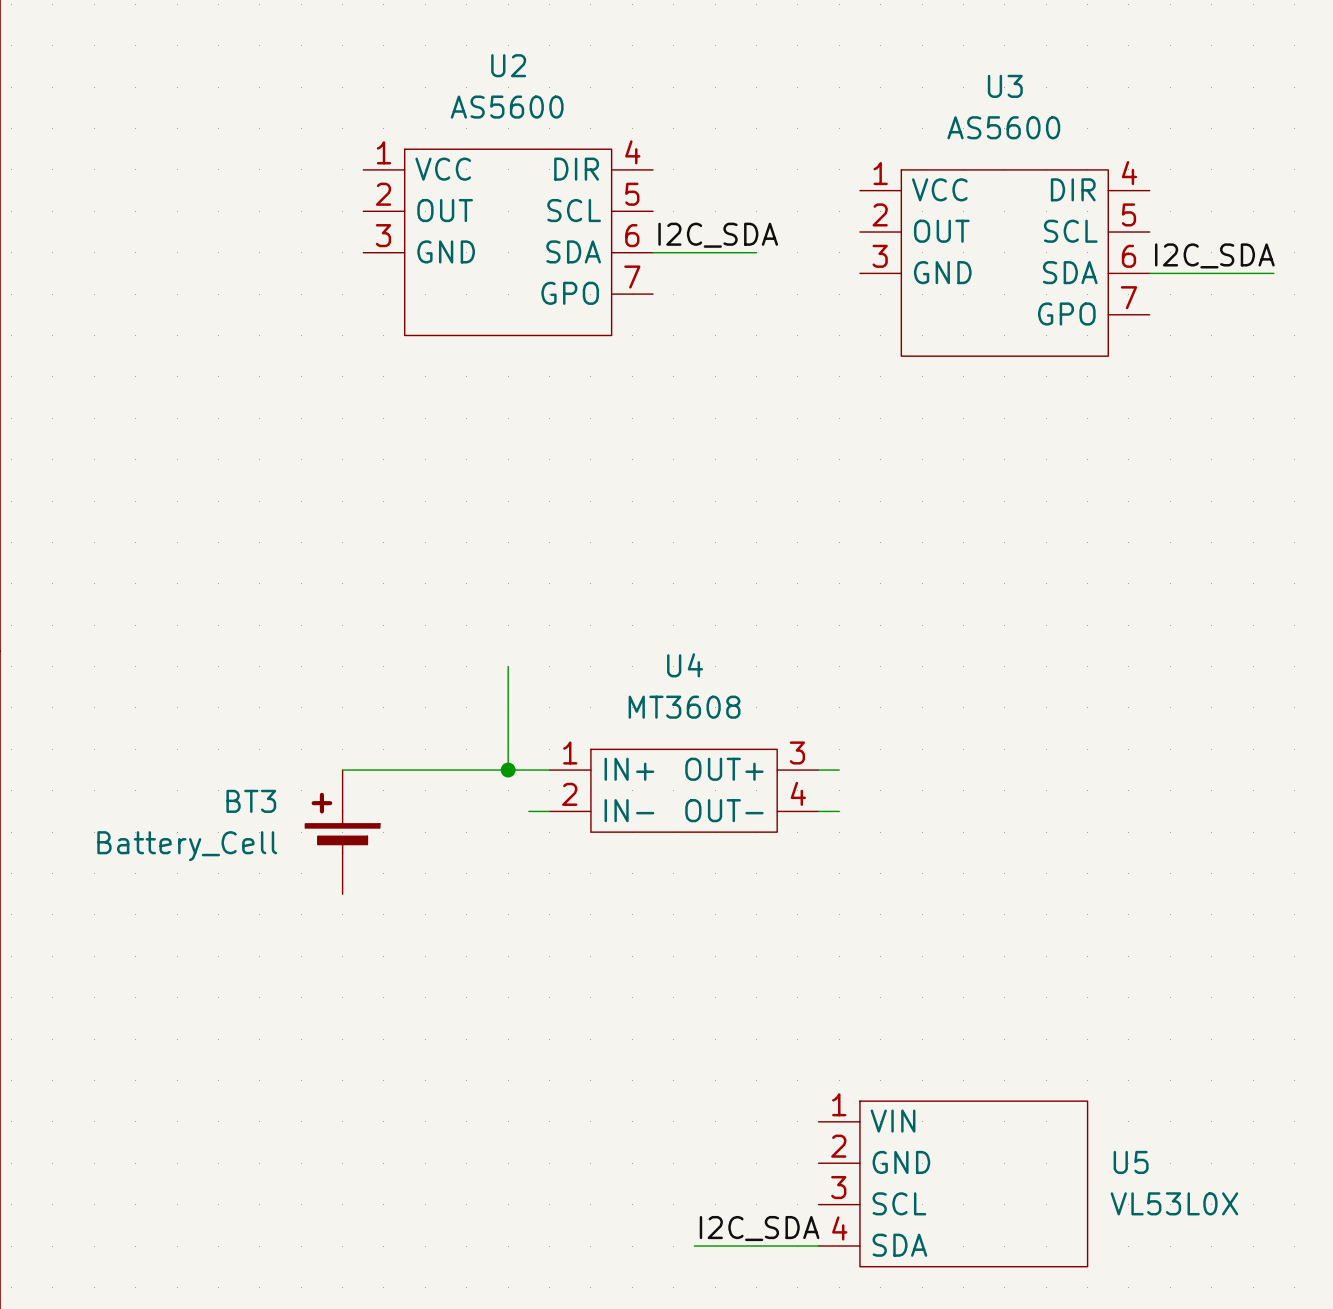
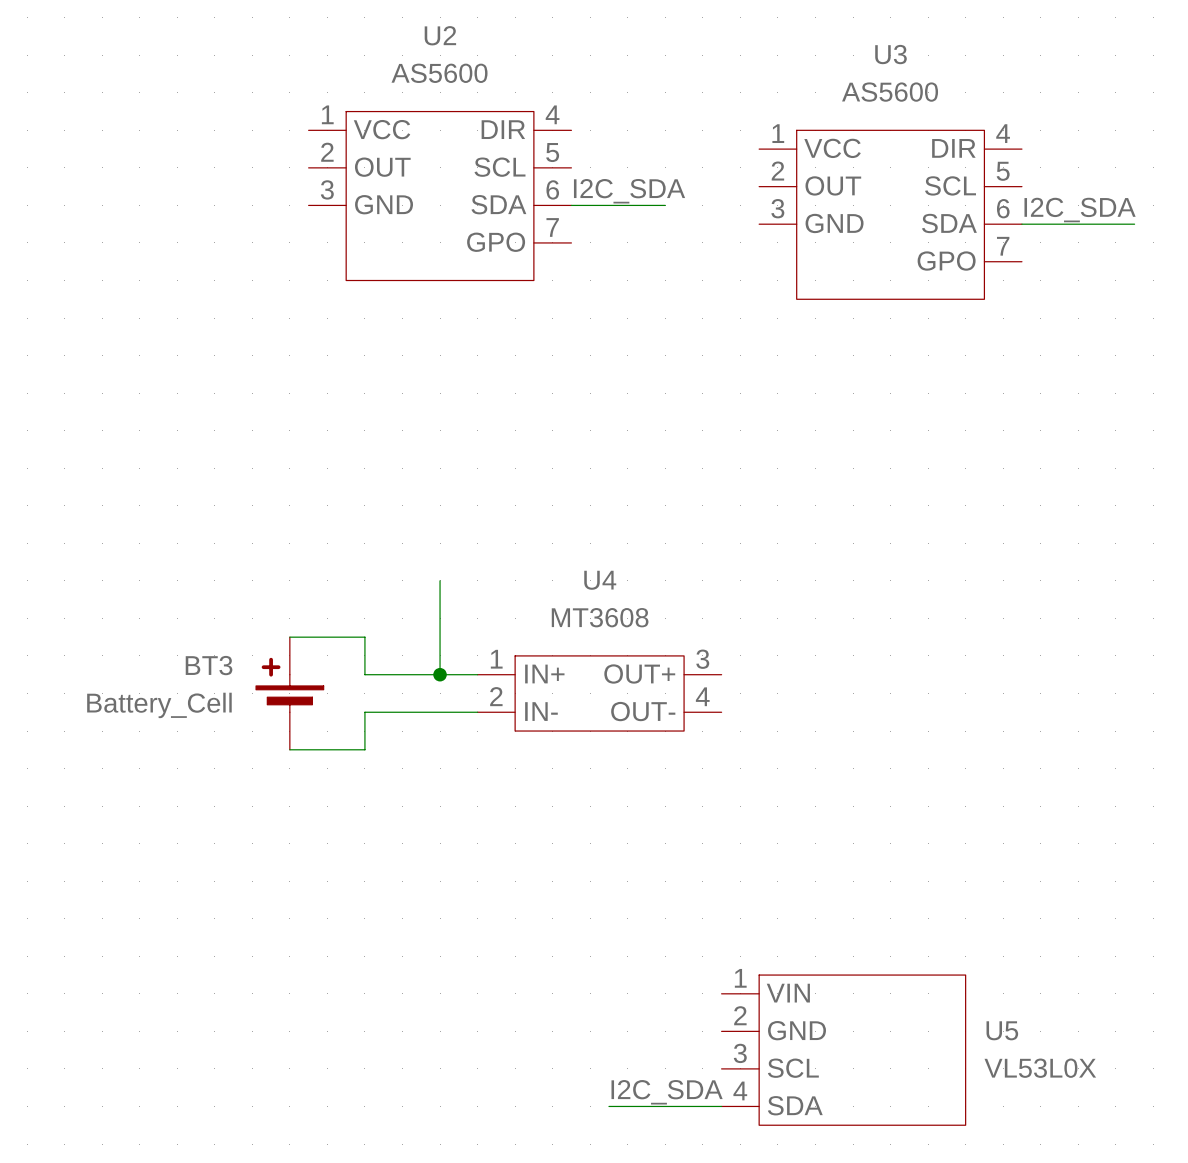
wire: (342, 770) (425, 770) -> (289, 637) (364, 637) (364, 674)
wire: (818, 770) (839, 770) -> none
wire: none -> (458, 712) (364, 712) (364, 749) (289, 749)
wire: (818, 811) (839, 811) -> none
BT3 position: (342, 832) -> (289, 693)

